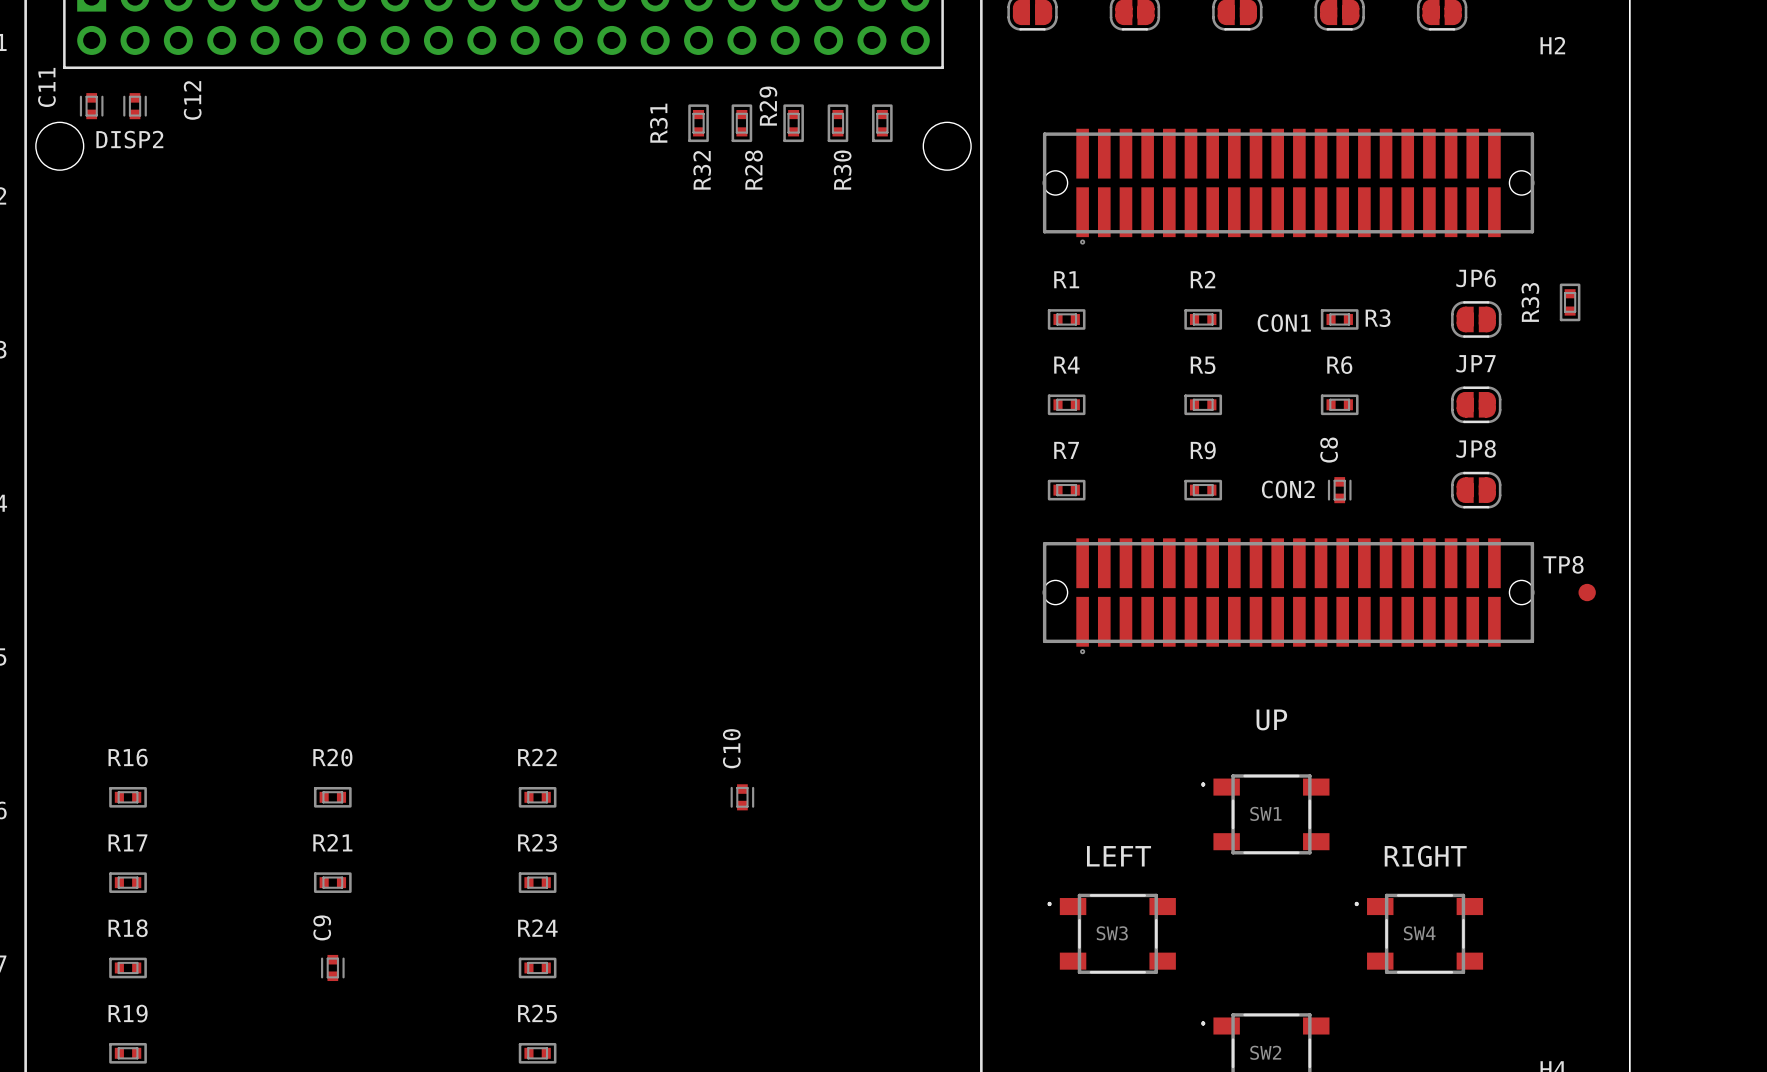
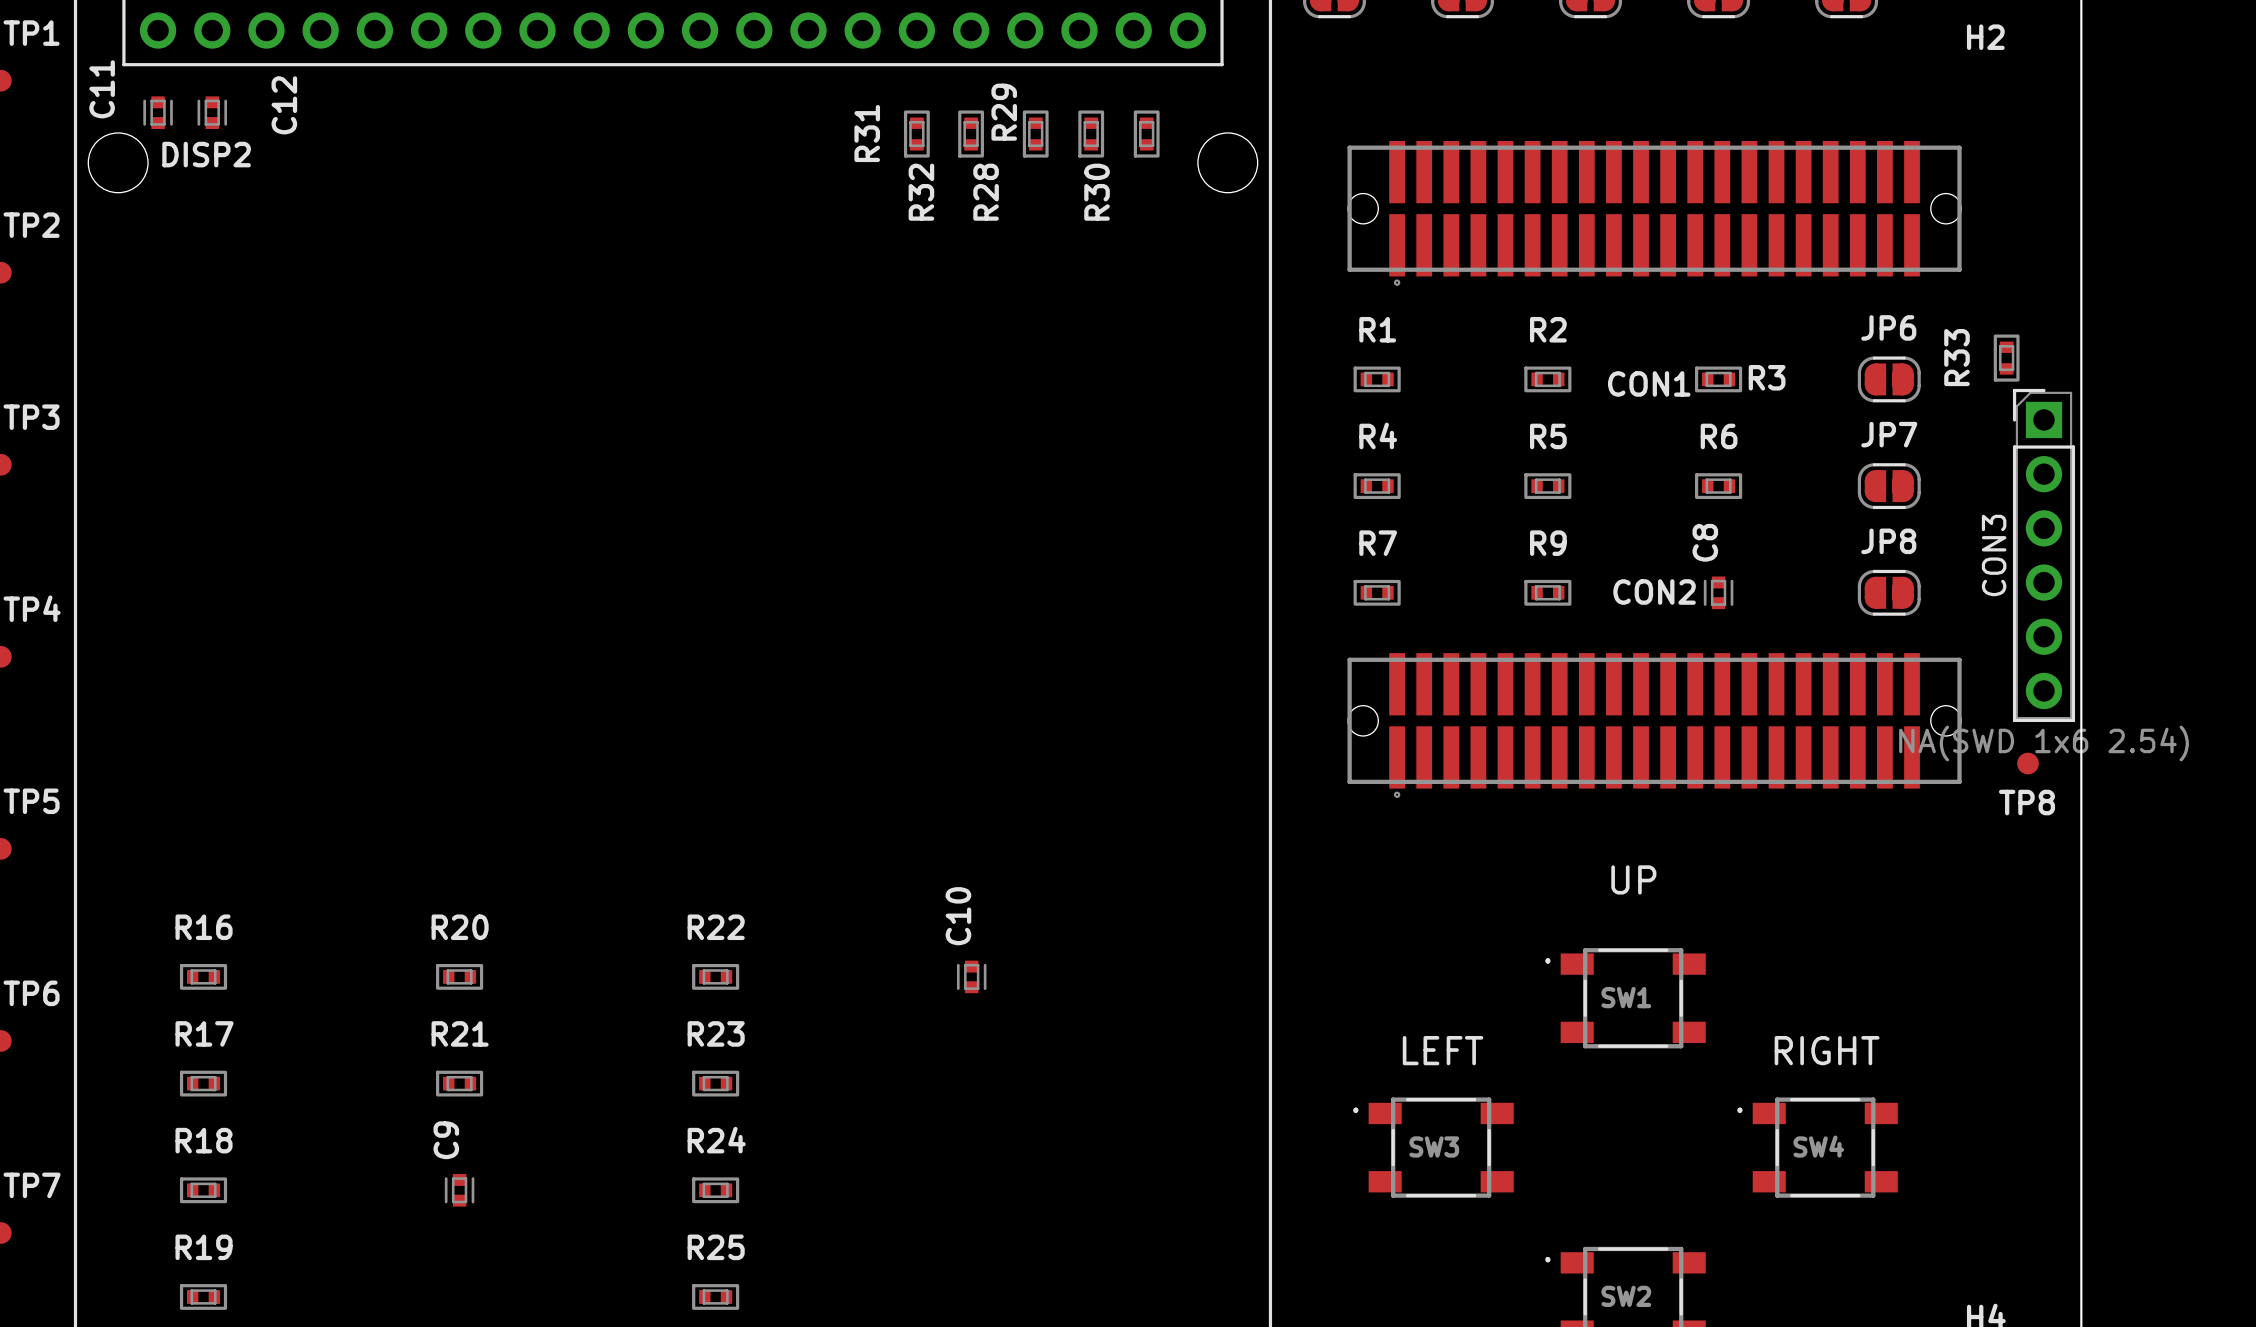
CON3: none -> NA(SWD 1x6 2.54) (2044, 555)
TP8 name position: TP8 (1563, 564) -> TP8 (2026, 802)
TP8 position: (1587, 592) -> (2027, 763)

